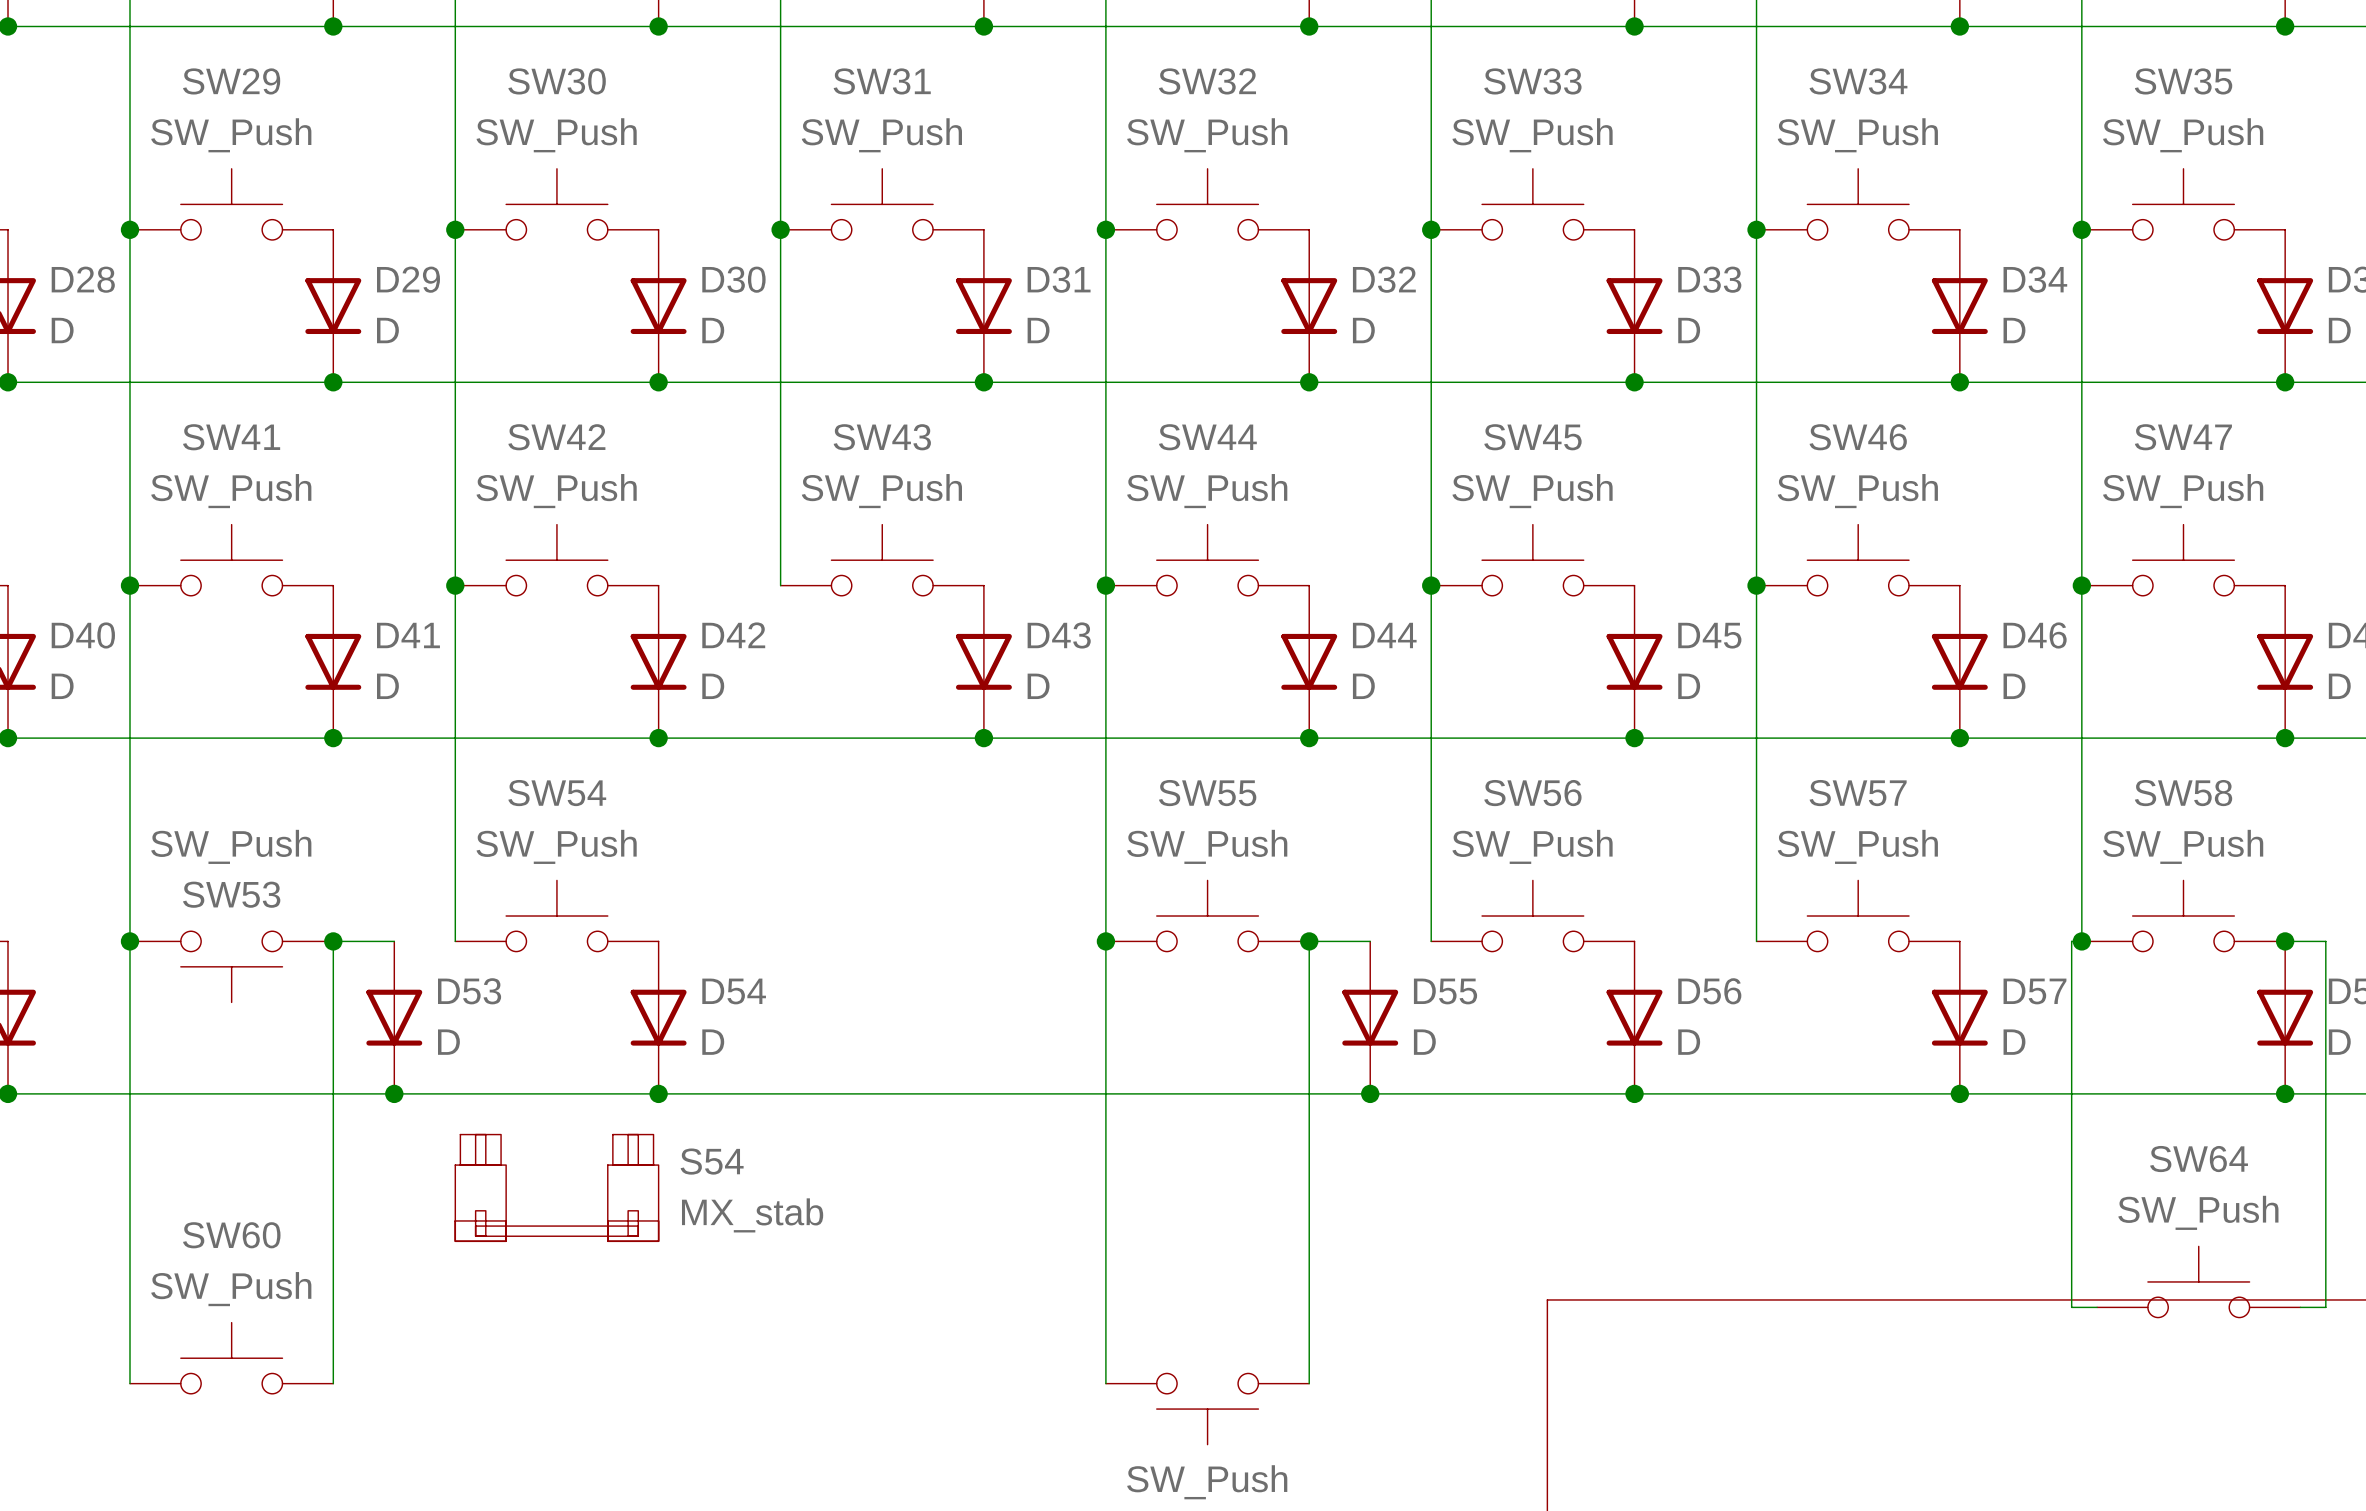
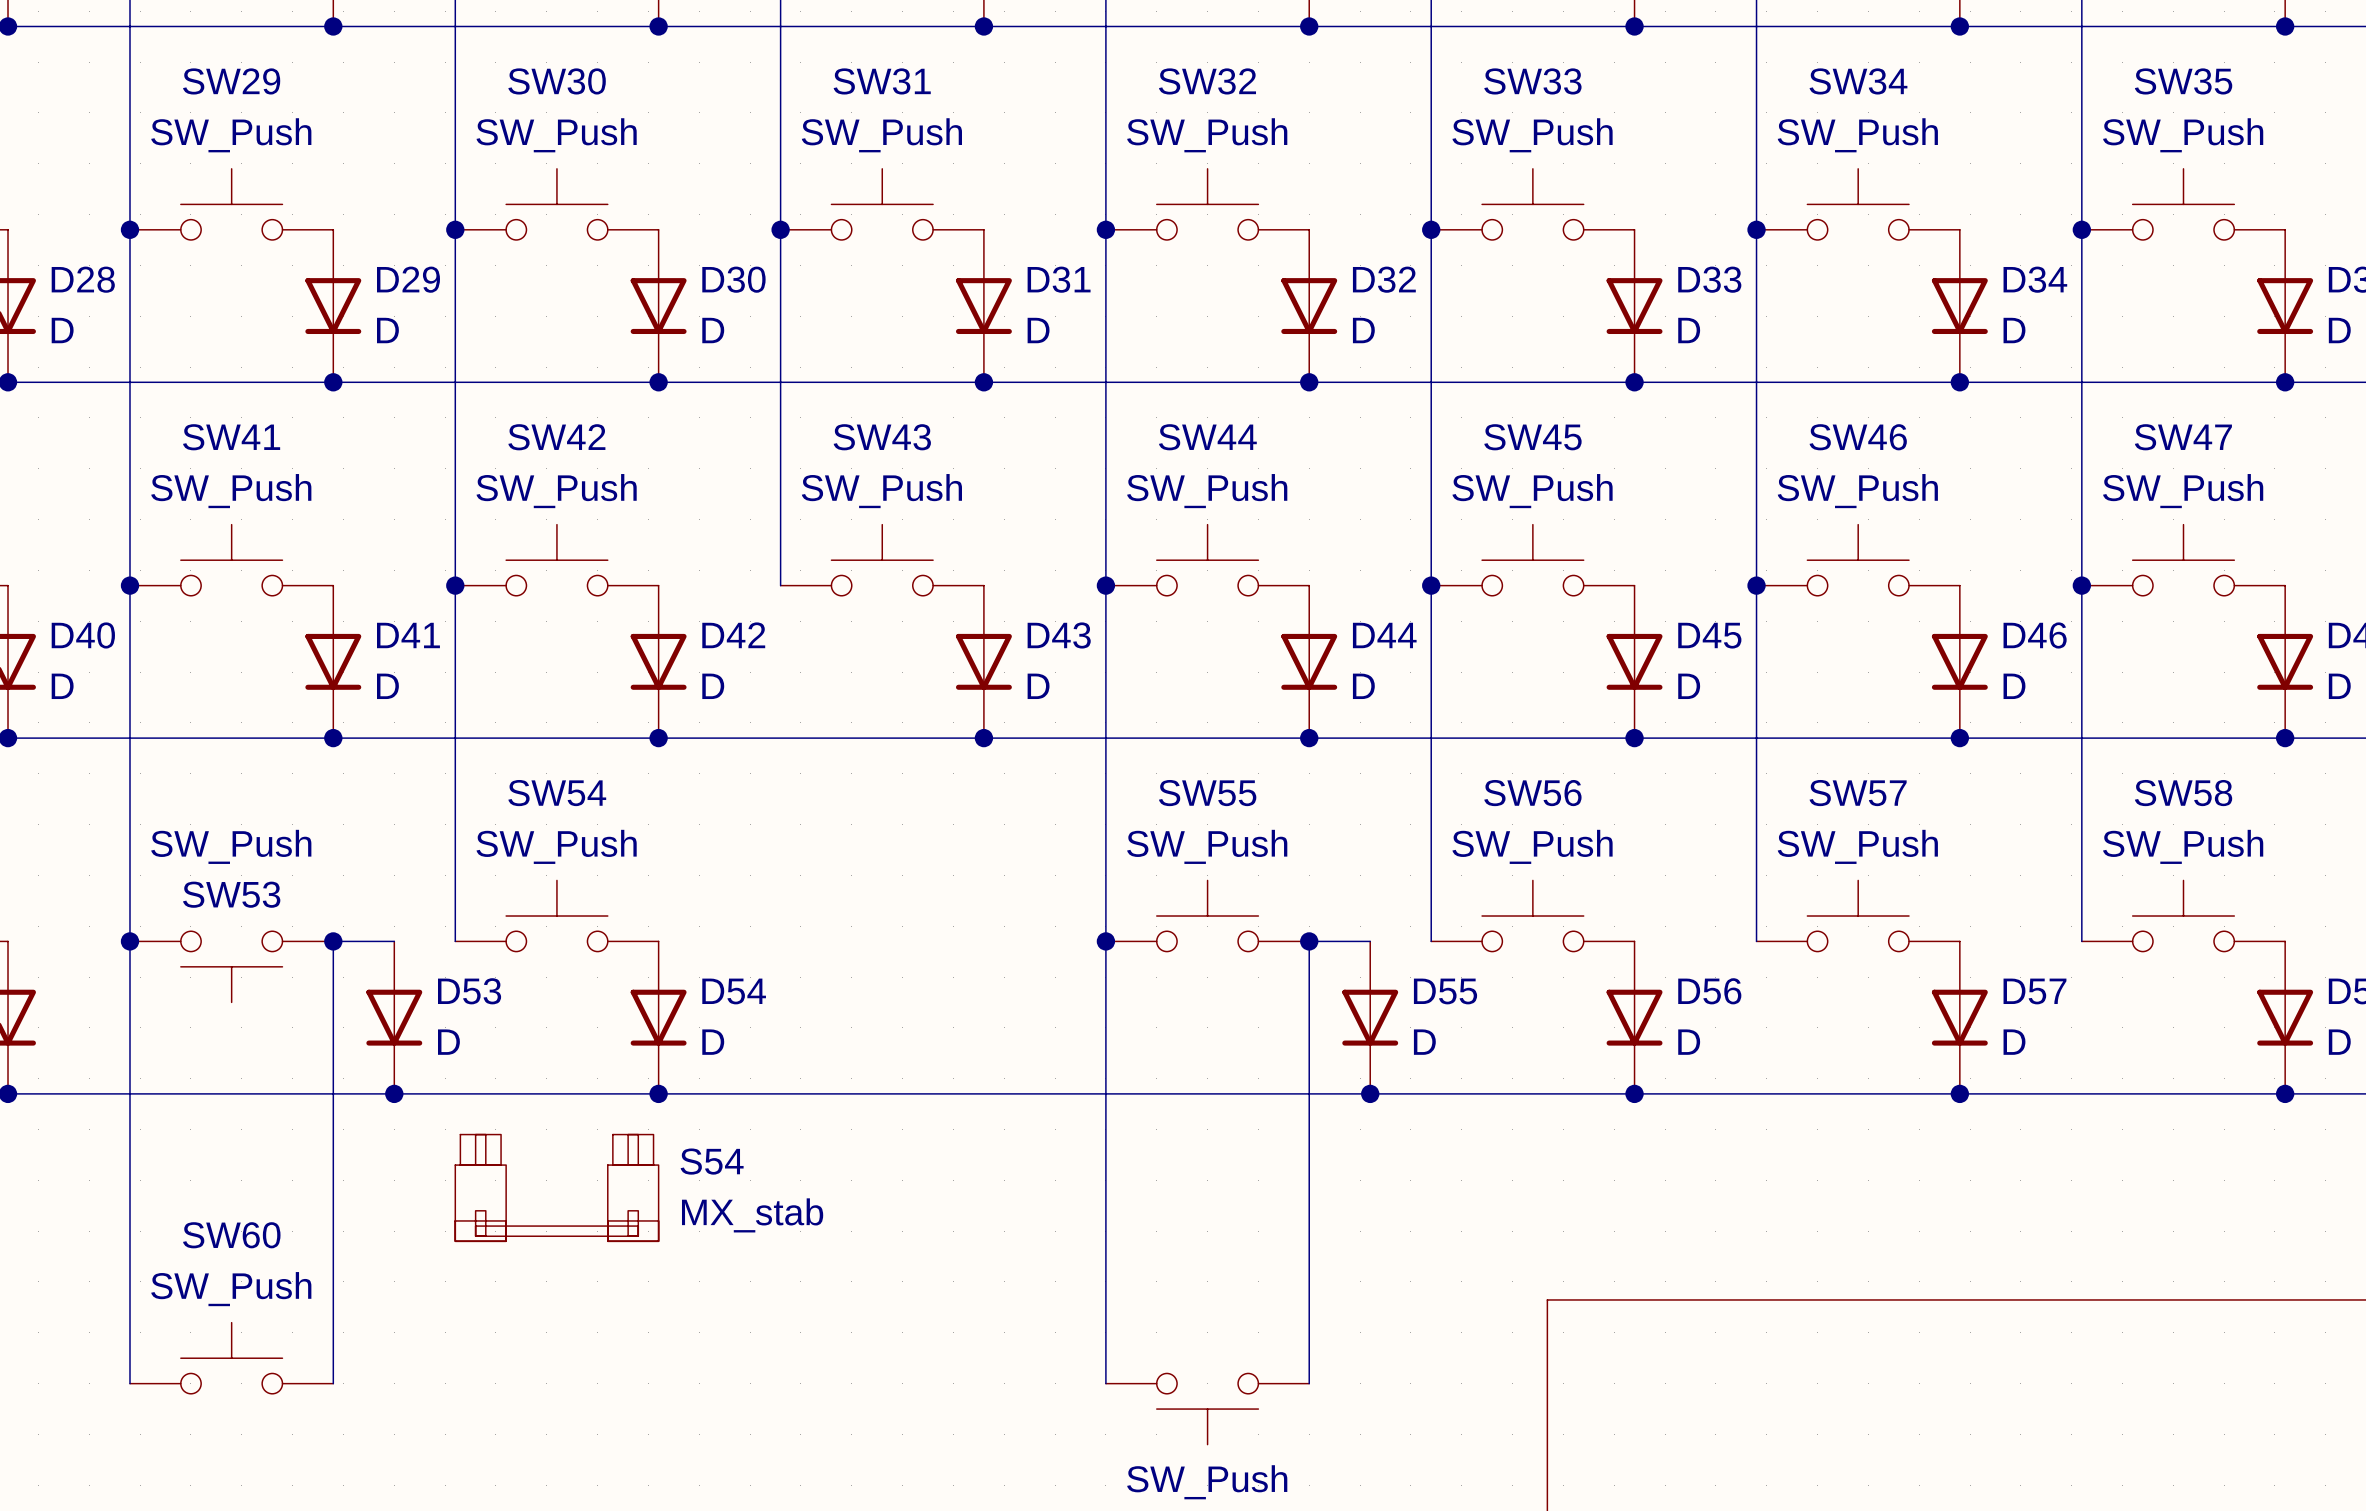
wire: (2081, 941) (2071, 941) (2071, 1307) (2097, 1307) -> none
junction: (2081, 941) -> none
wire: (2285, 941) (2325, 941) (2325, 1307) (2300, 1307) -> none
junction: (2285, 941) -> none
SW64: SW_Push (2198, 1281) -> none

